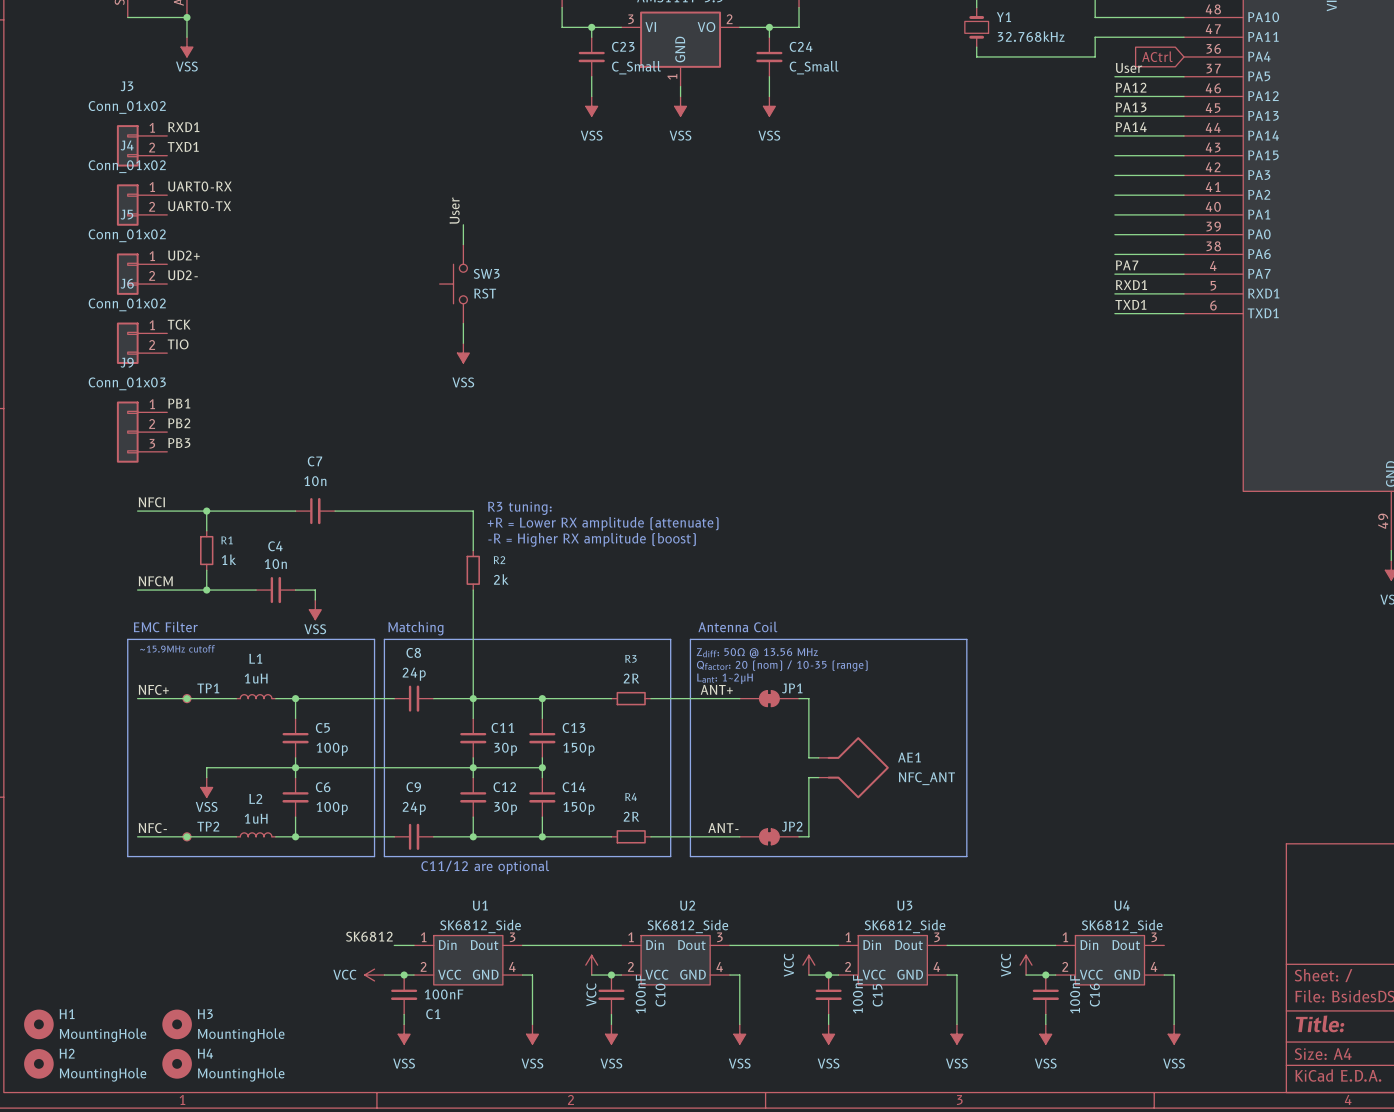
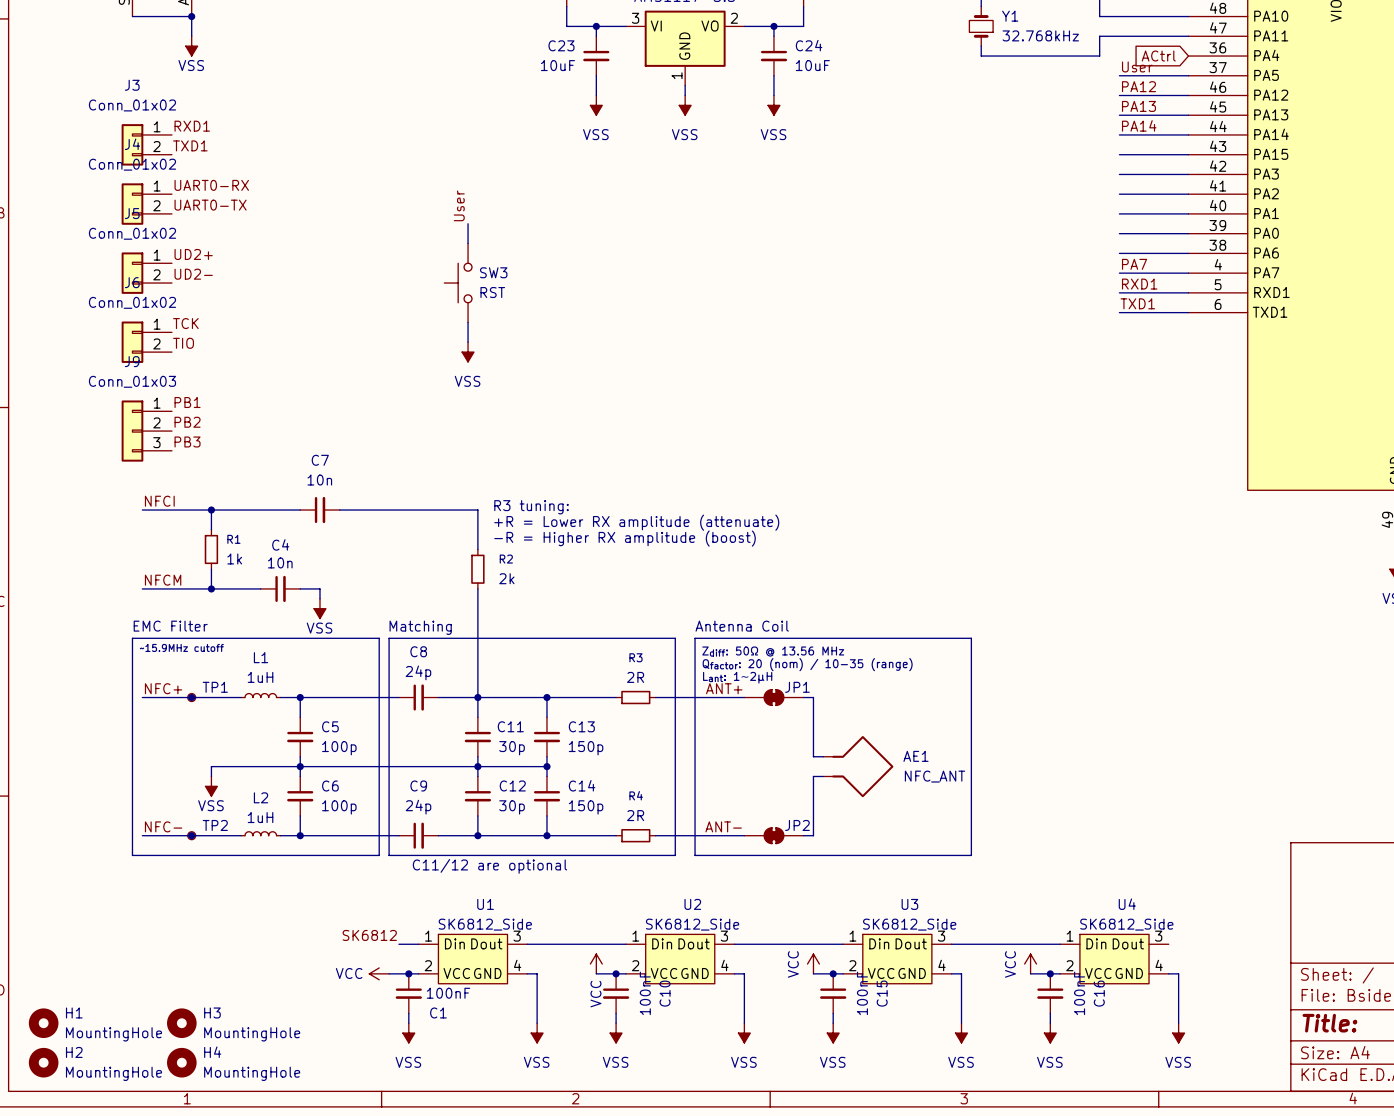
C23 name position: C23 (623, 46) -> C23 (561, 45)
C23 value: C_Small (636, 67) -> 10uF (557, 65)
C24 value: C_Small (814, 67) -> 10uF (812, 65)

